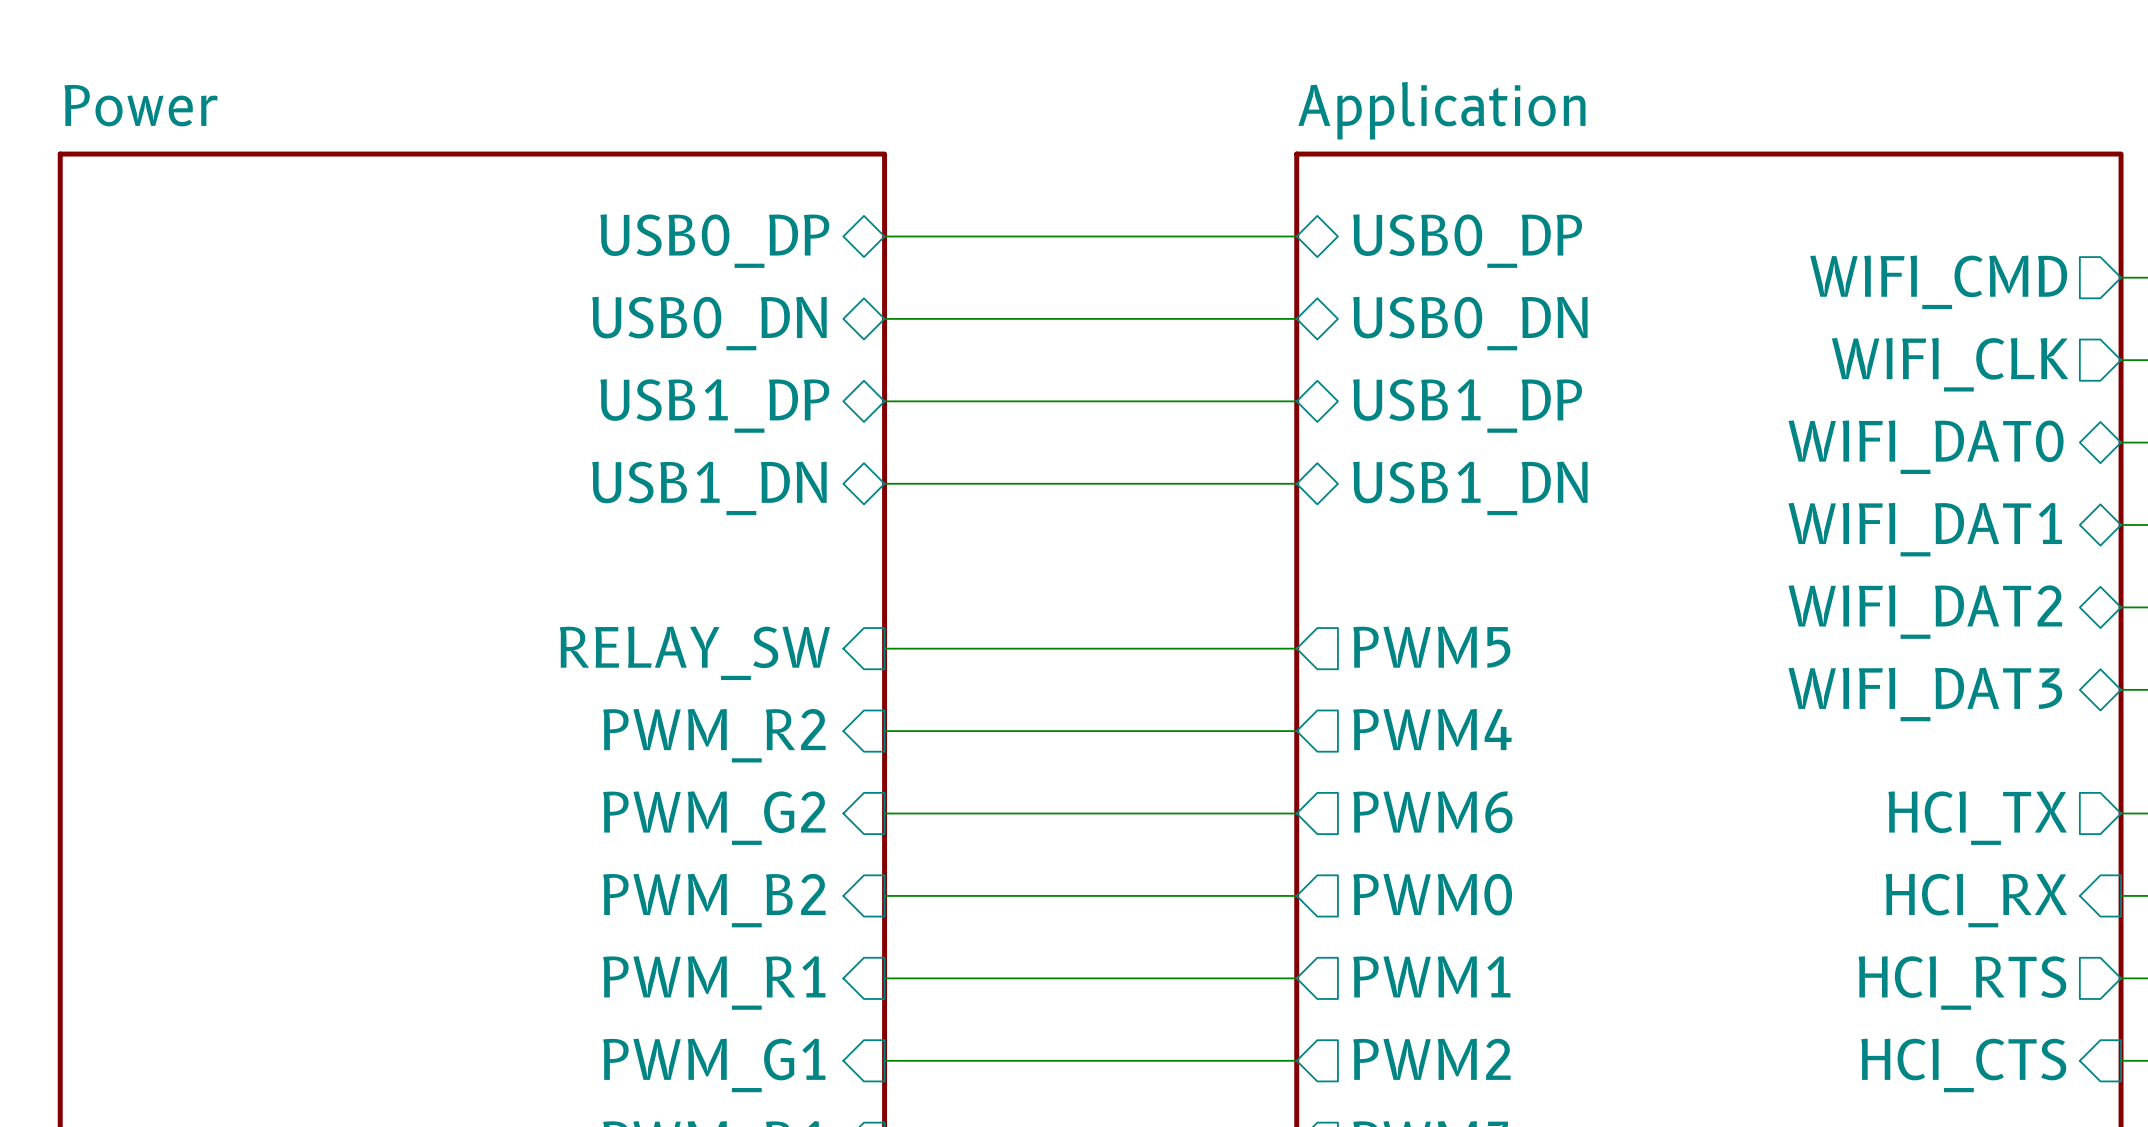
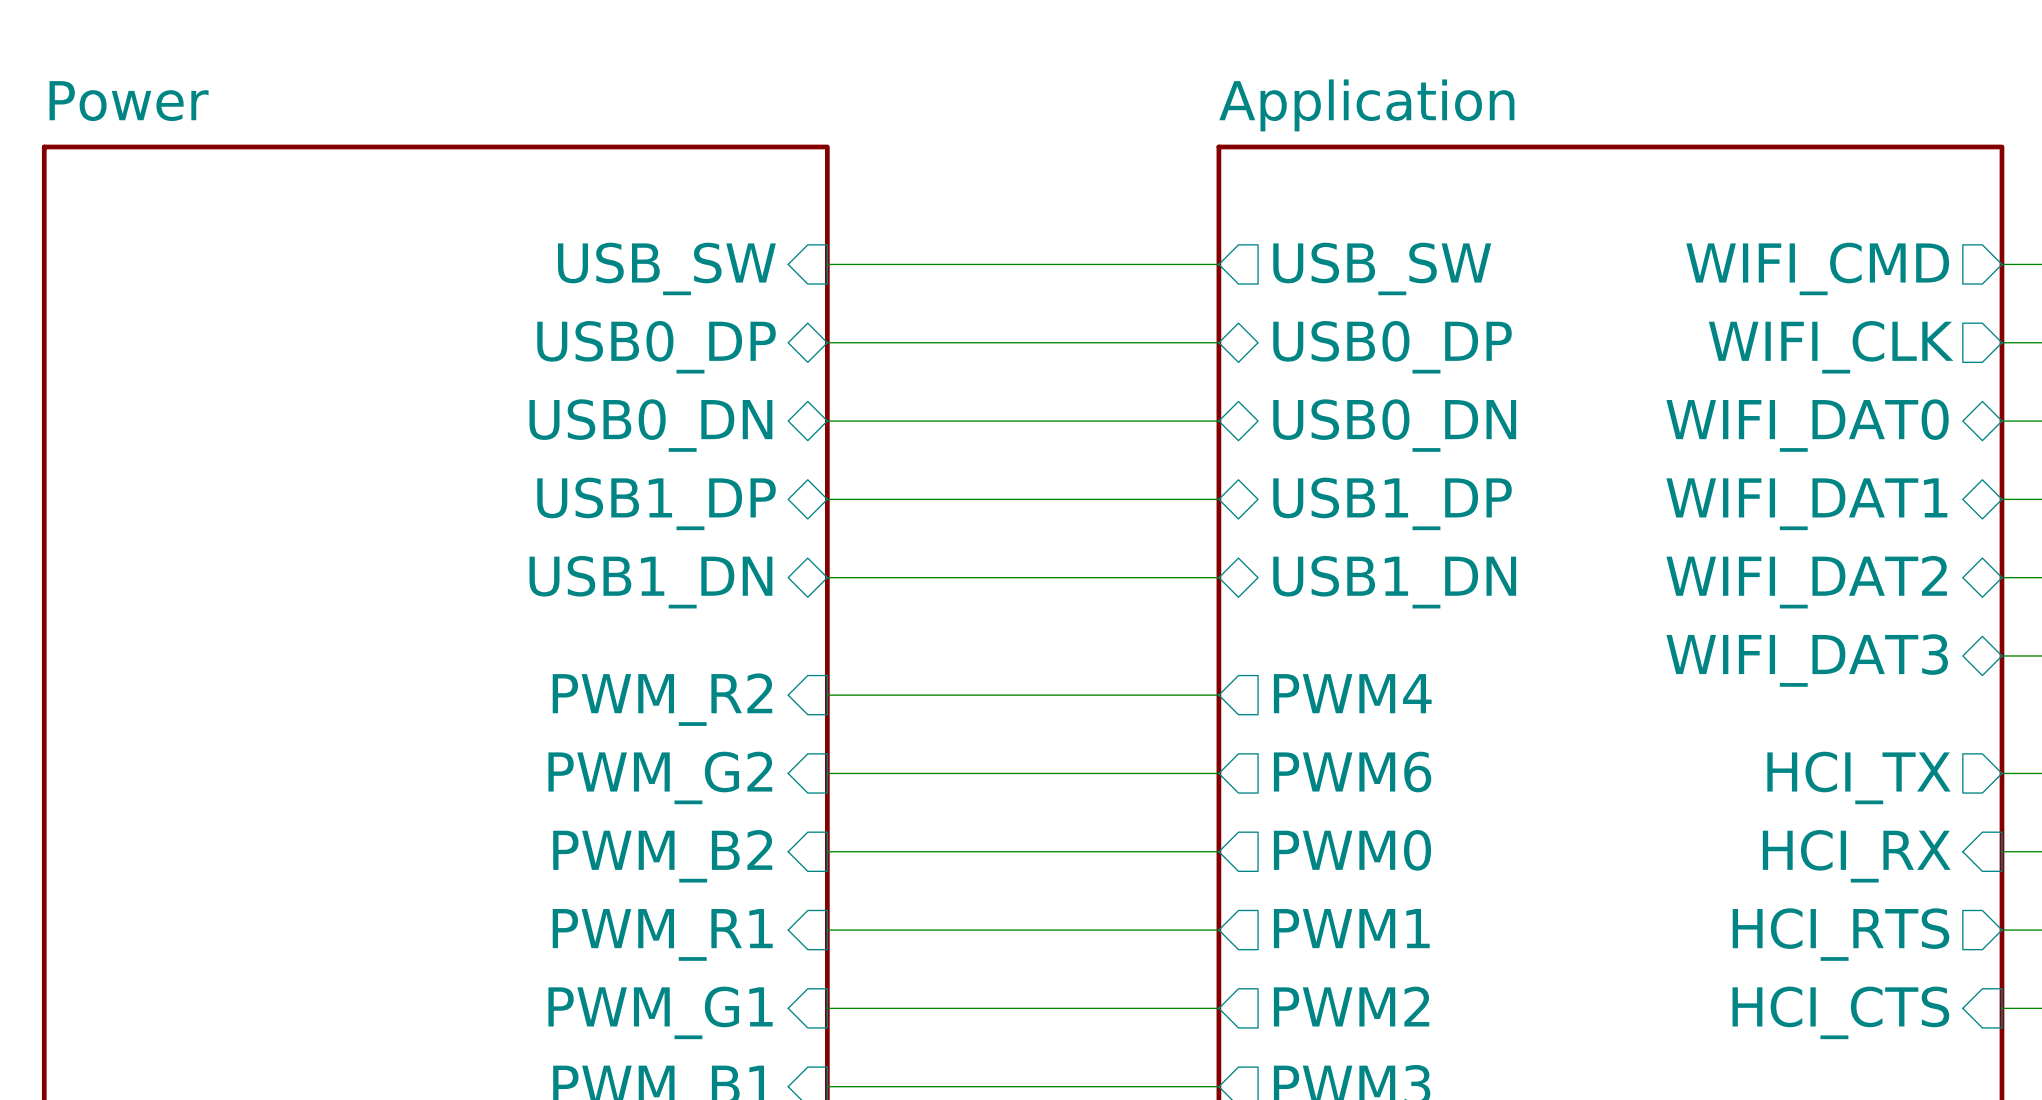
wire: (884, 236) (1296, 236) -> (827, 264) (1218, 264)
sheet pin position: USB0_DP (714, 241) -> USB0_DP (656, 347)
sheet pin position: USB0_DP (1467, 241) -> USB0_DP (1392, 347)
sheet pin: none -> USB_SW (666, 268)
sheet pin: none -> USB_SW (1382, 268)
wire: (884, 318) (1296, 318) -> (827, 342) (1218, 342)
sheet pin position: USB0_DN (709, 323) -> USB0_DN (650, 425)
sheet pin position: USB0_DN (1470, 323) -> USB0_DN (1394, 425)
wire: (884, 401) (1296, 401) -> (827, 421) (1218, 421)
sheet pin position: USB1_DP (714, 405) -> USB1_DP (656, 503)
sheet pin position: USB1_DP (1467, 405) -> USB1_DP (1392, 503)
wire: (884, 483) (1296, 483) -> (827, 499) (1218, 499)
sheet pin position: USB1_DN (709, 488) -> USB1_DN (650, 582)
sheet pin position: USB1_DN (1470, 488) -> USB1_DN (1394, 582)
sheet pin: PWM5 (1431, 647) -> none
wire: (884, 648) (1296, 648) -> (827, 577) (1218, 577)
sheet pin: RELAY_SW (694, 653) -> none

